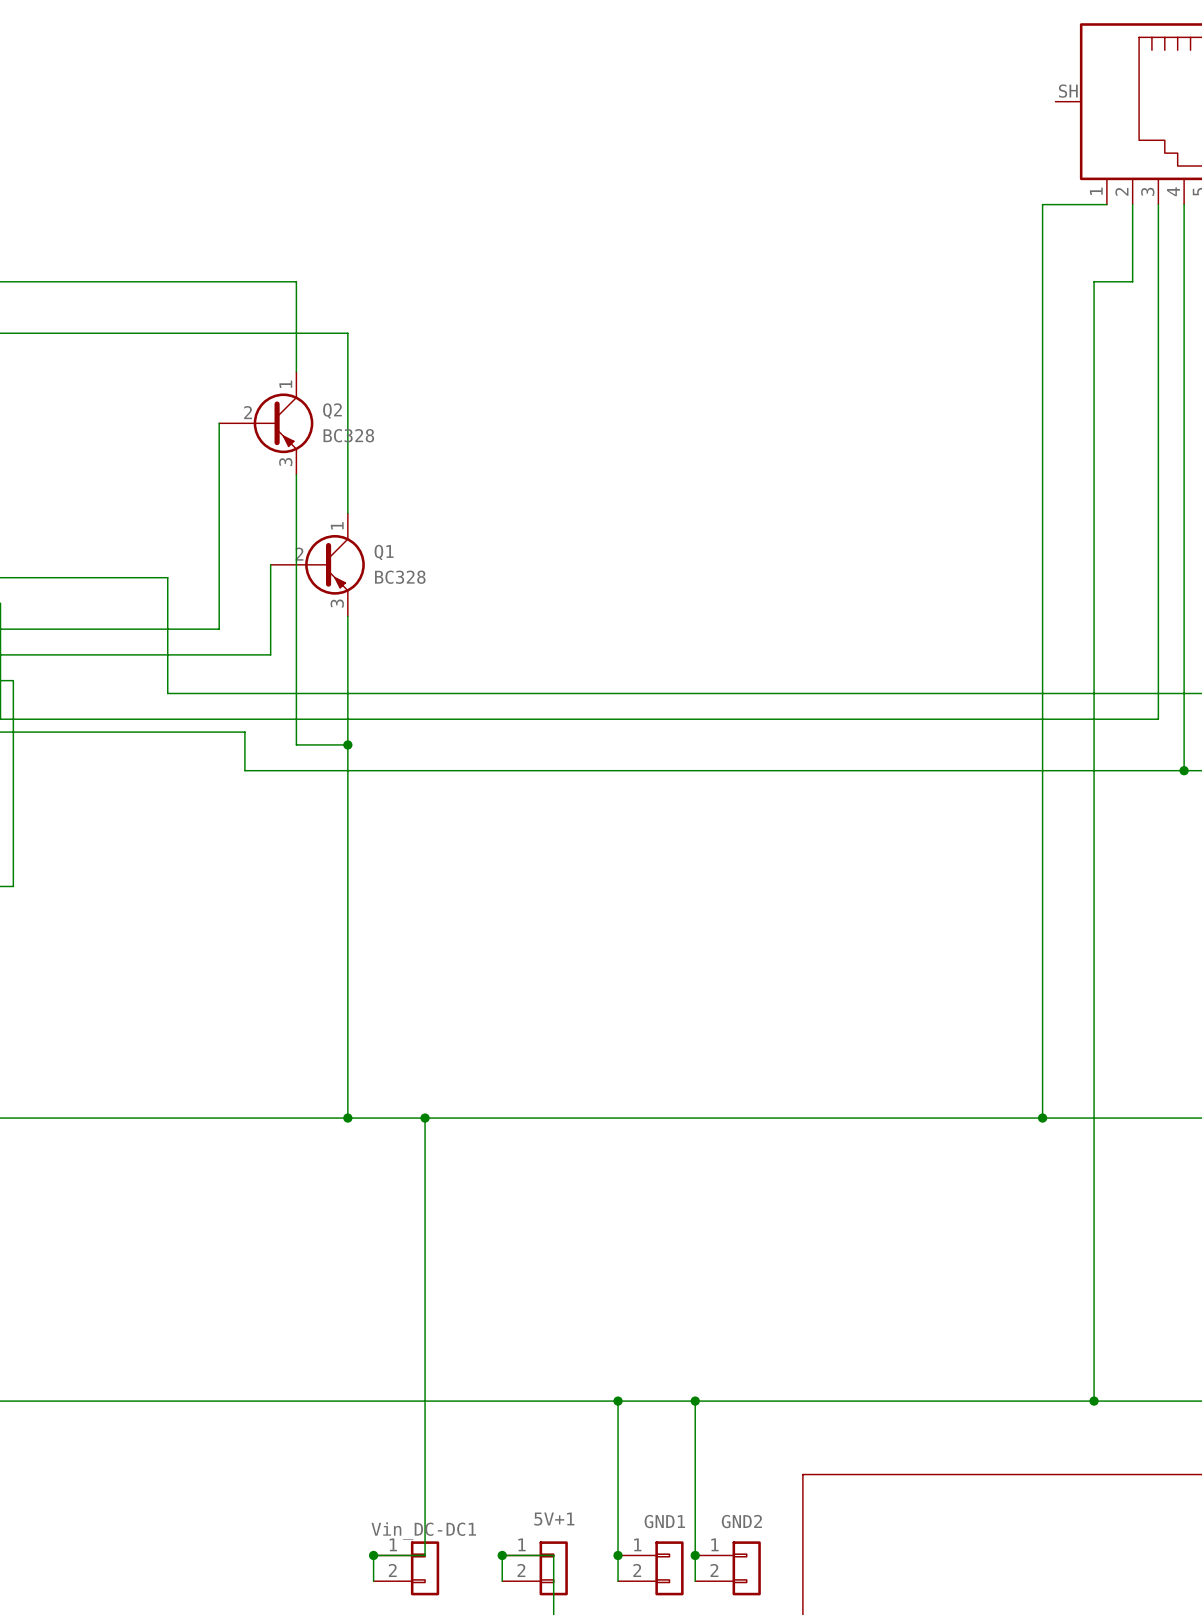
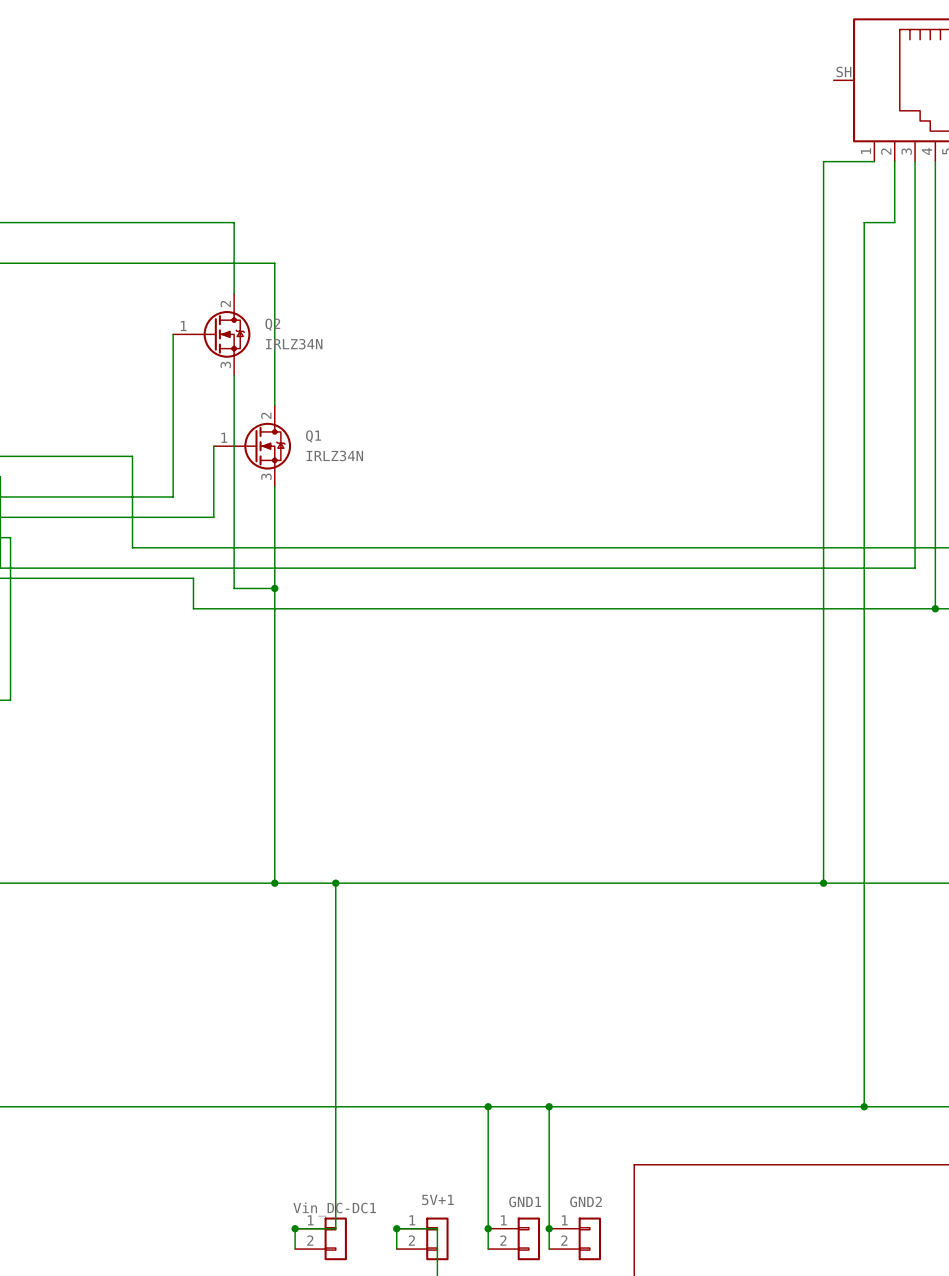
Q2 symbol: [219, 371, 314, 475] -> [173, 293, 251, 376]
Q2 value: BC328 (348, 435) -> IRLZ34N (294, 344)
Q1 symbol: [270, 513, 365, 617] -> [213, 405, 292, 487]
Q1 value: BC328 (400, 577) -> IRLZ34N (334, 455)

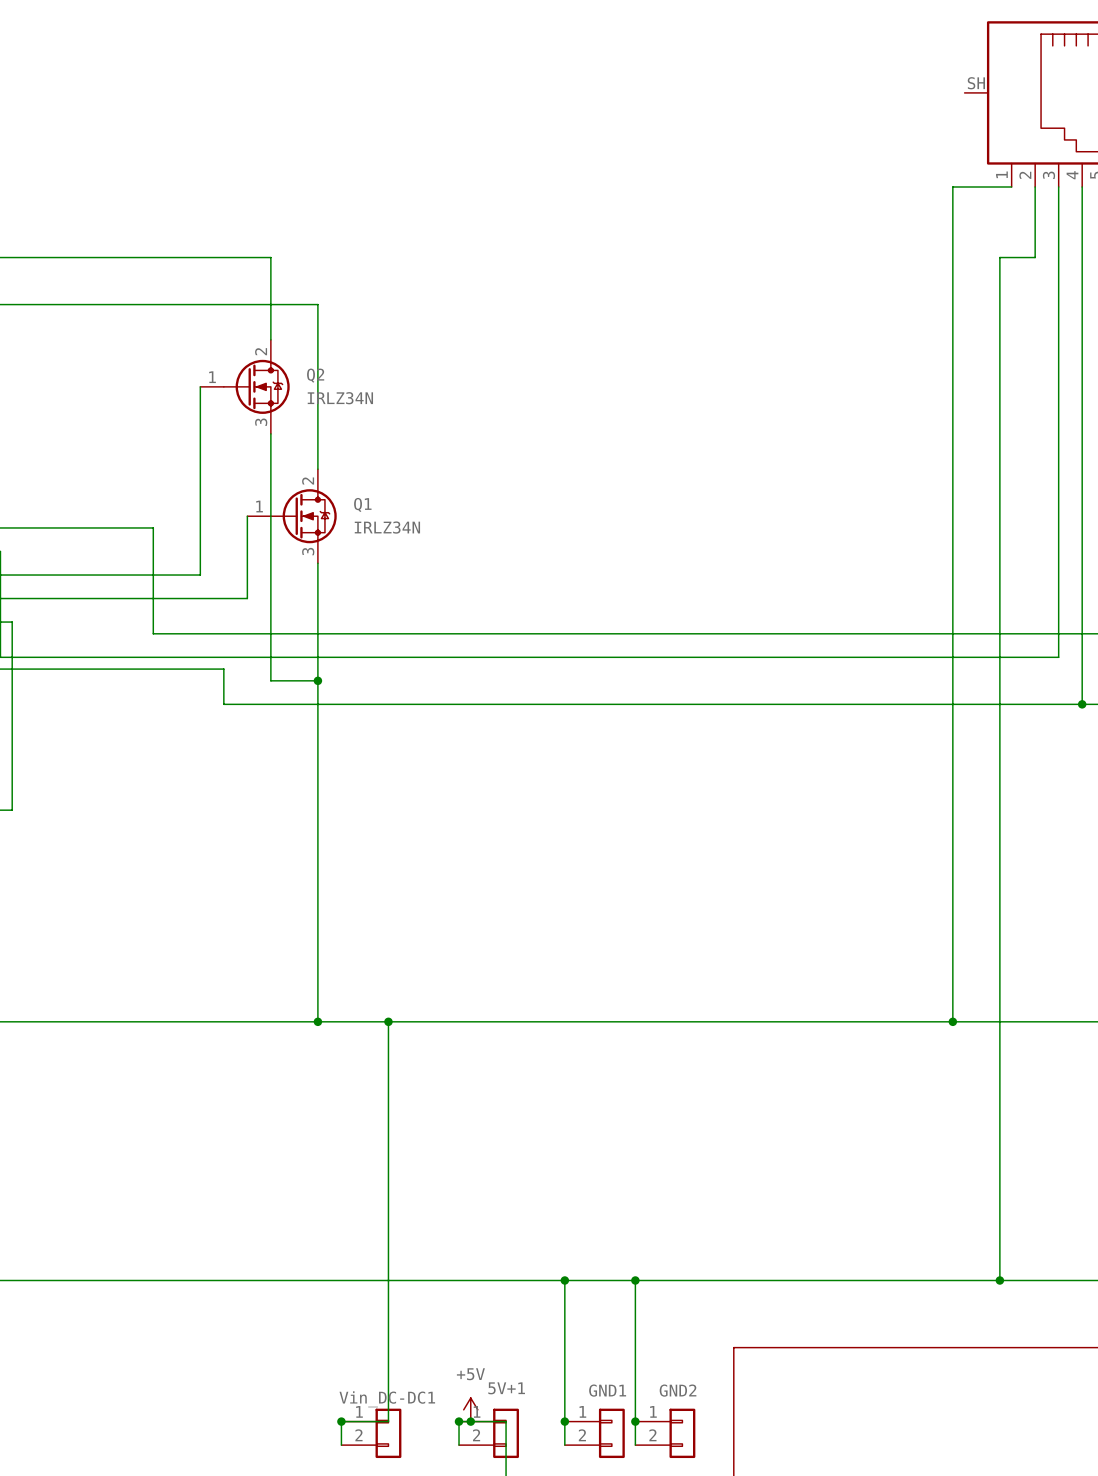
power symbol: none -> +5V (470, 1409)
junction: none -> (470, 1421)

